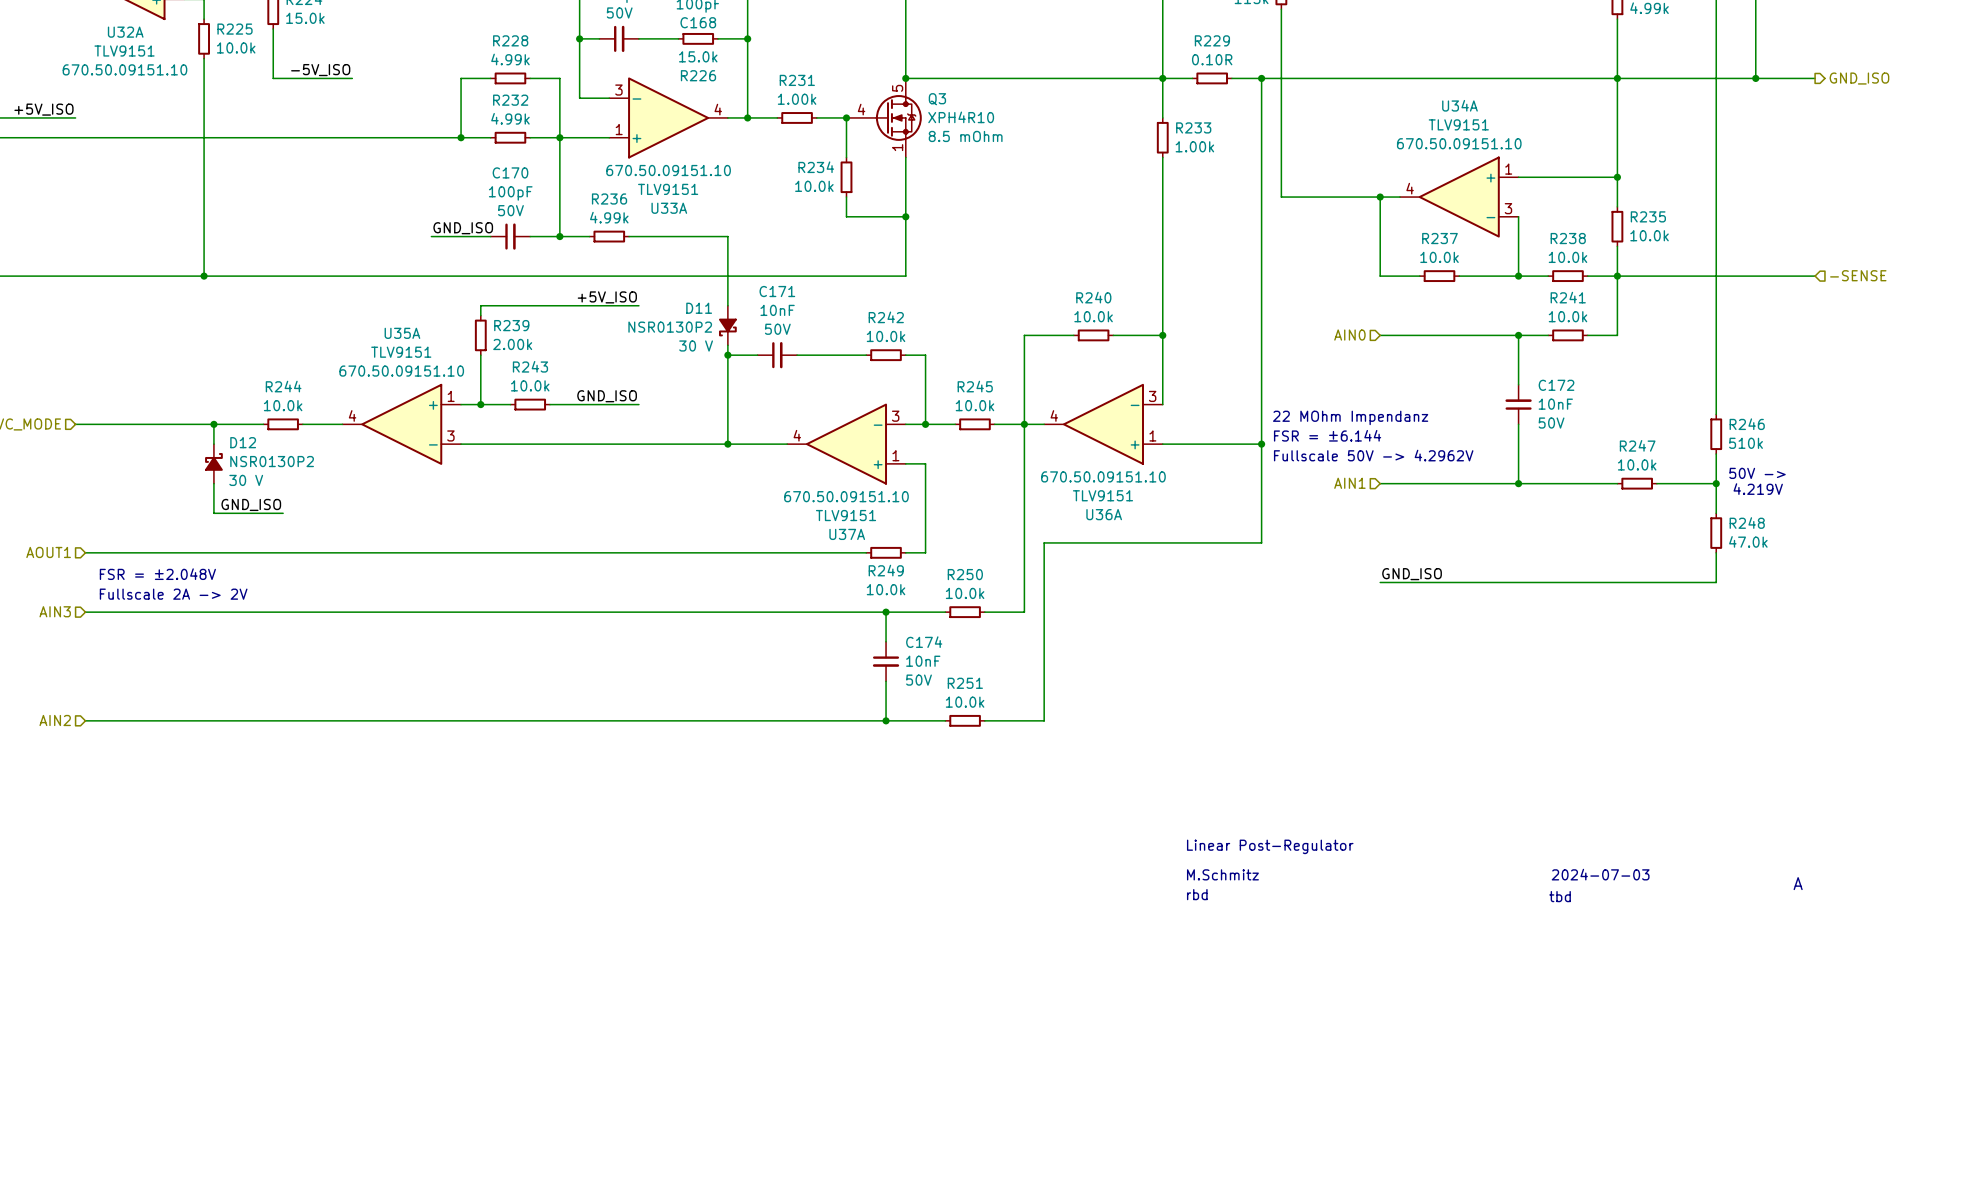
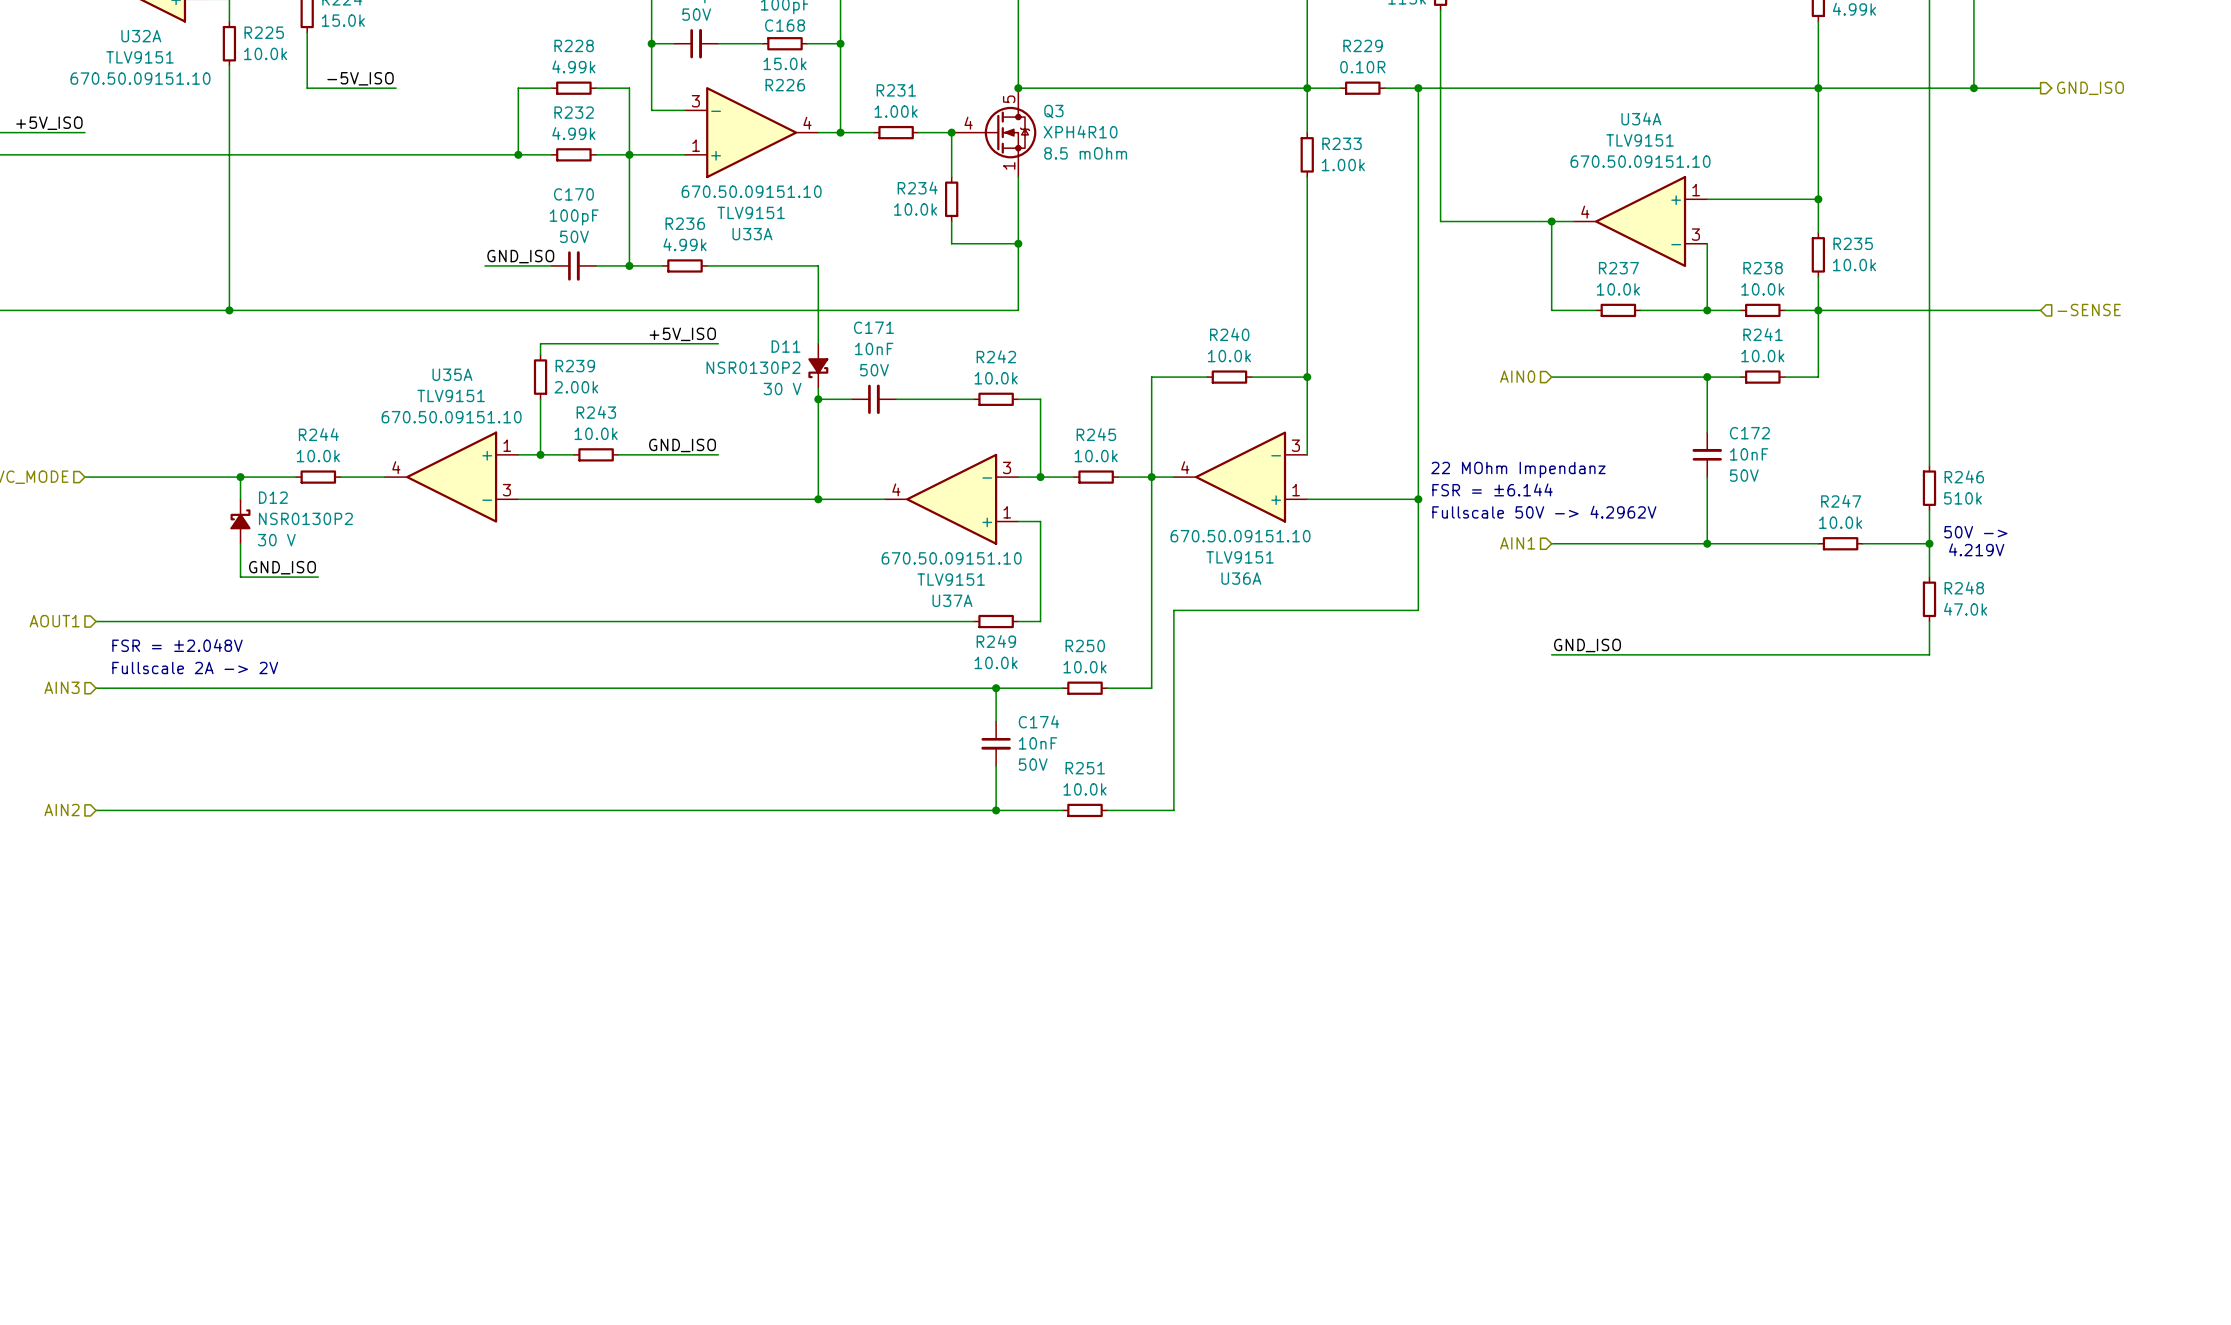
text: Linear Post-Regulator (1270, 846) -> none
text: M.Schmitz (1222, 874) -> none
text: 2024-07-03 (1600, 874) -> none
text: A (1798, 883) -> none
text: rbd (1197, 894) -> none
text: tbd (1560, 896) -> none

